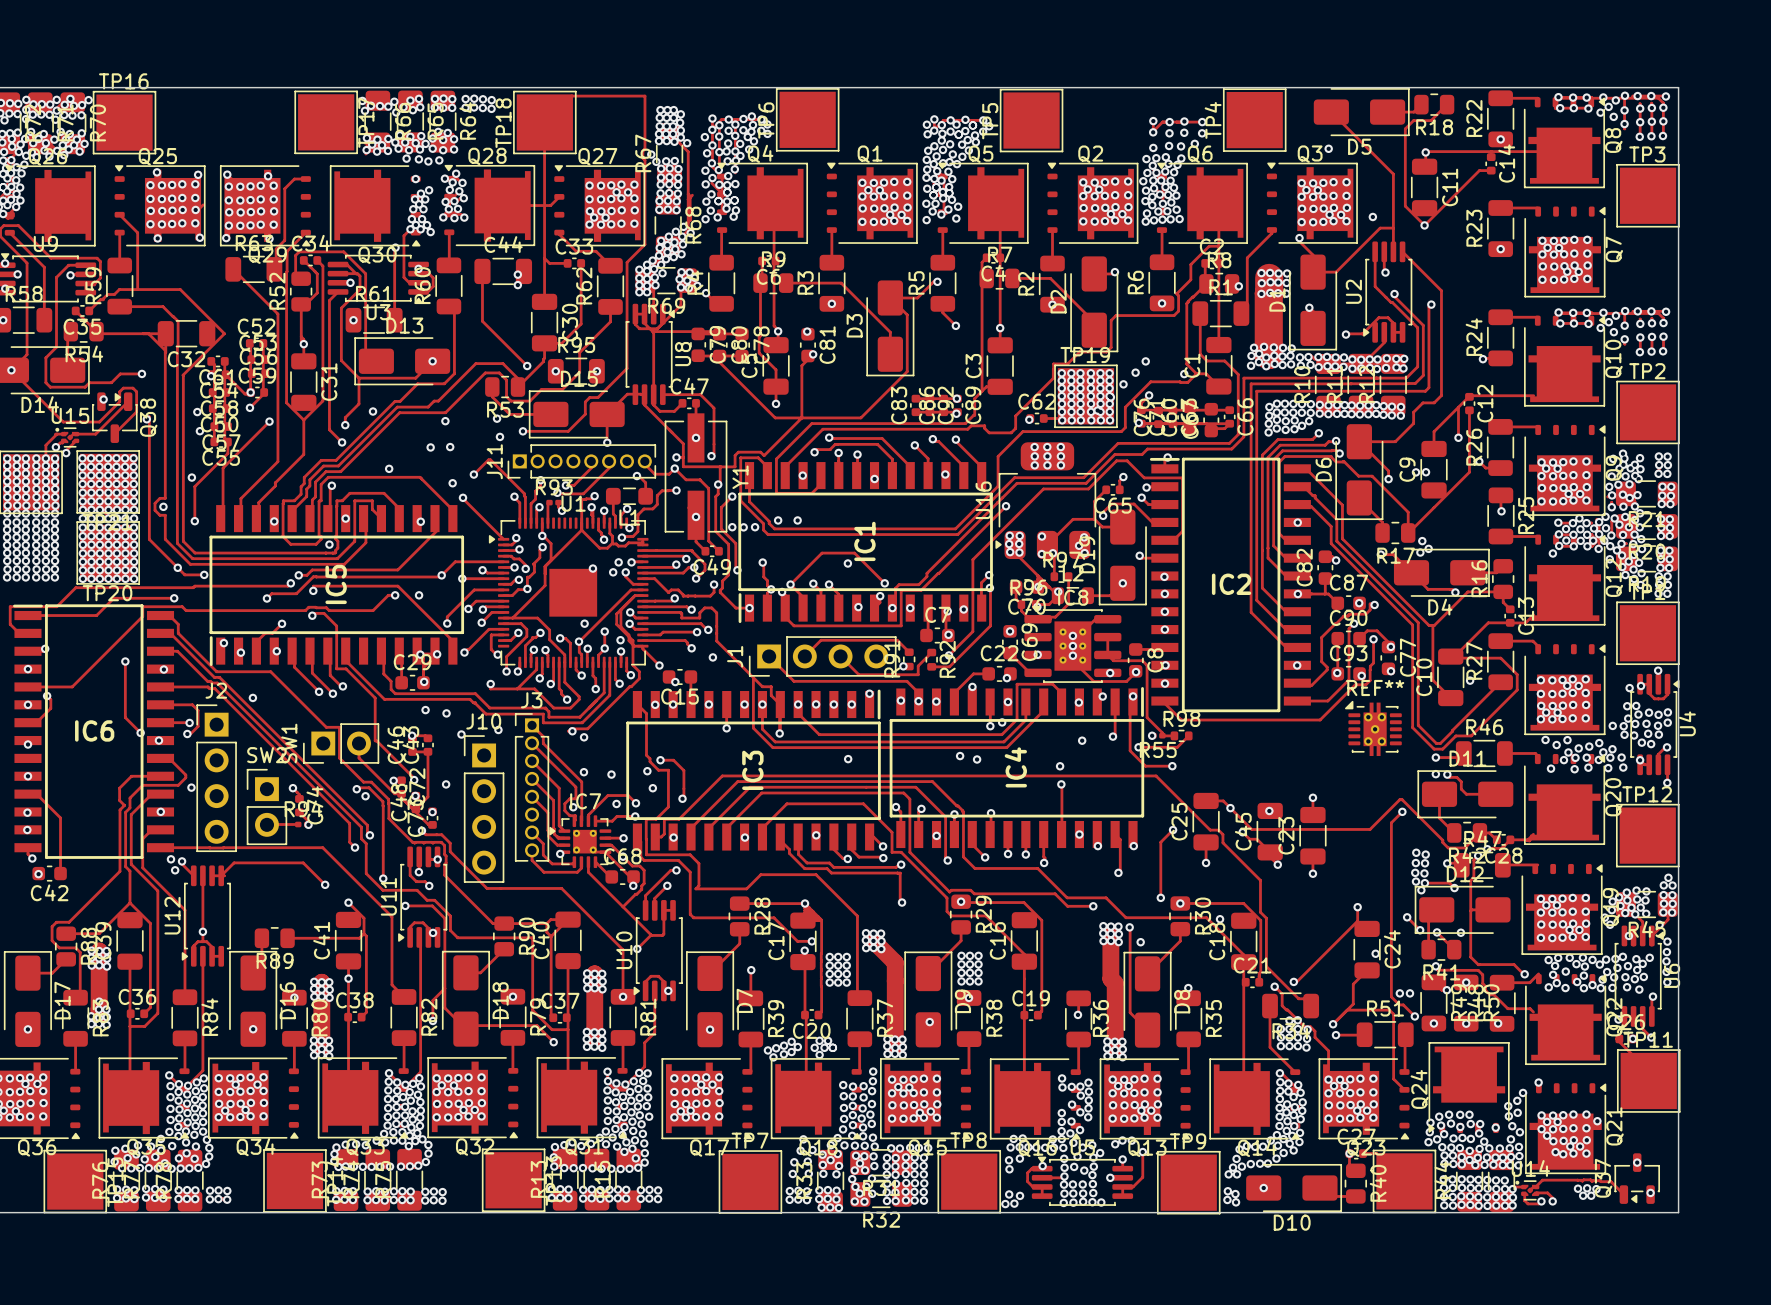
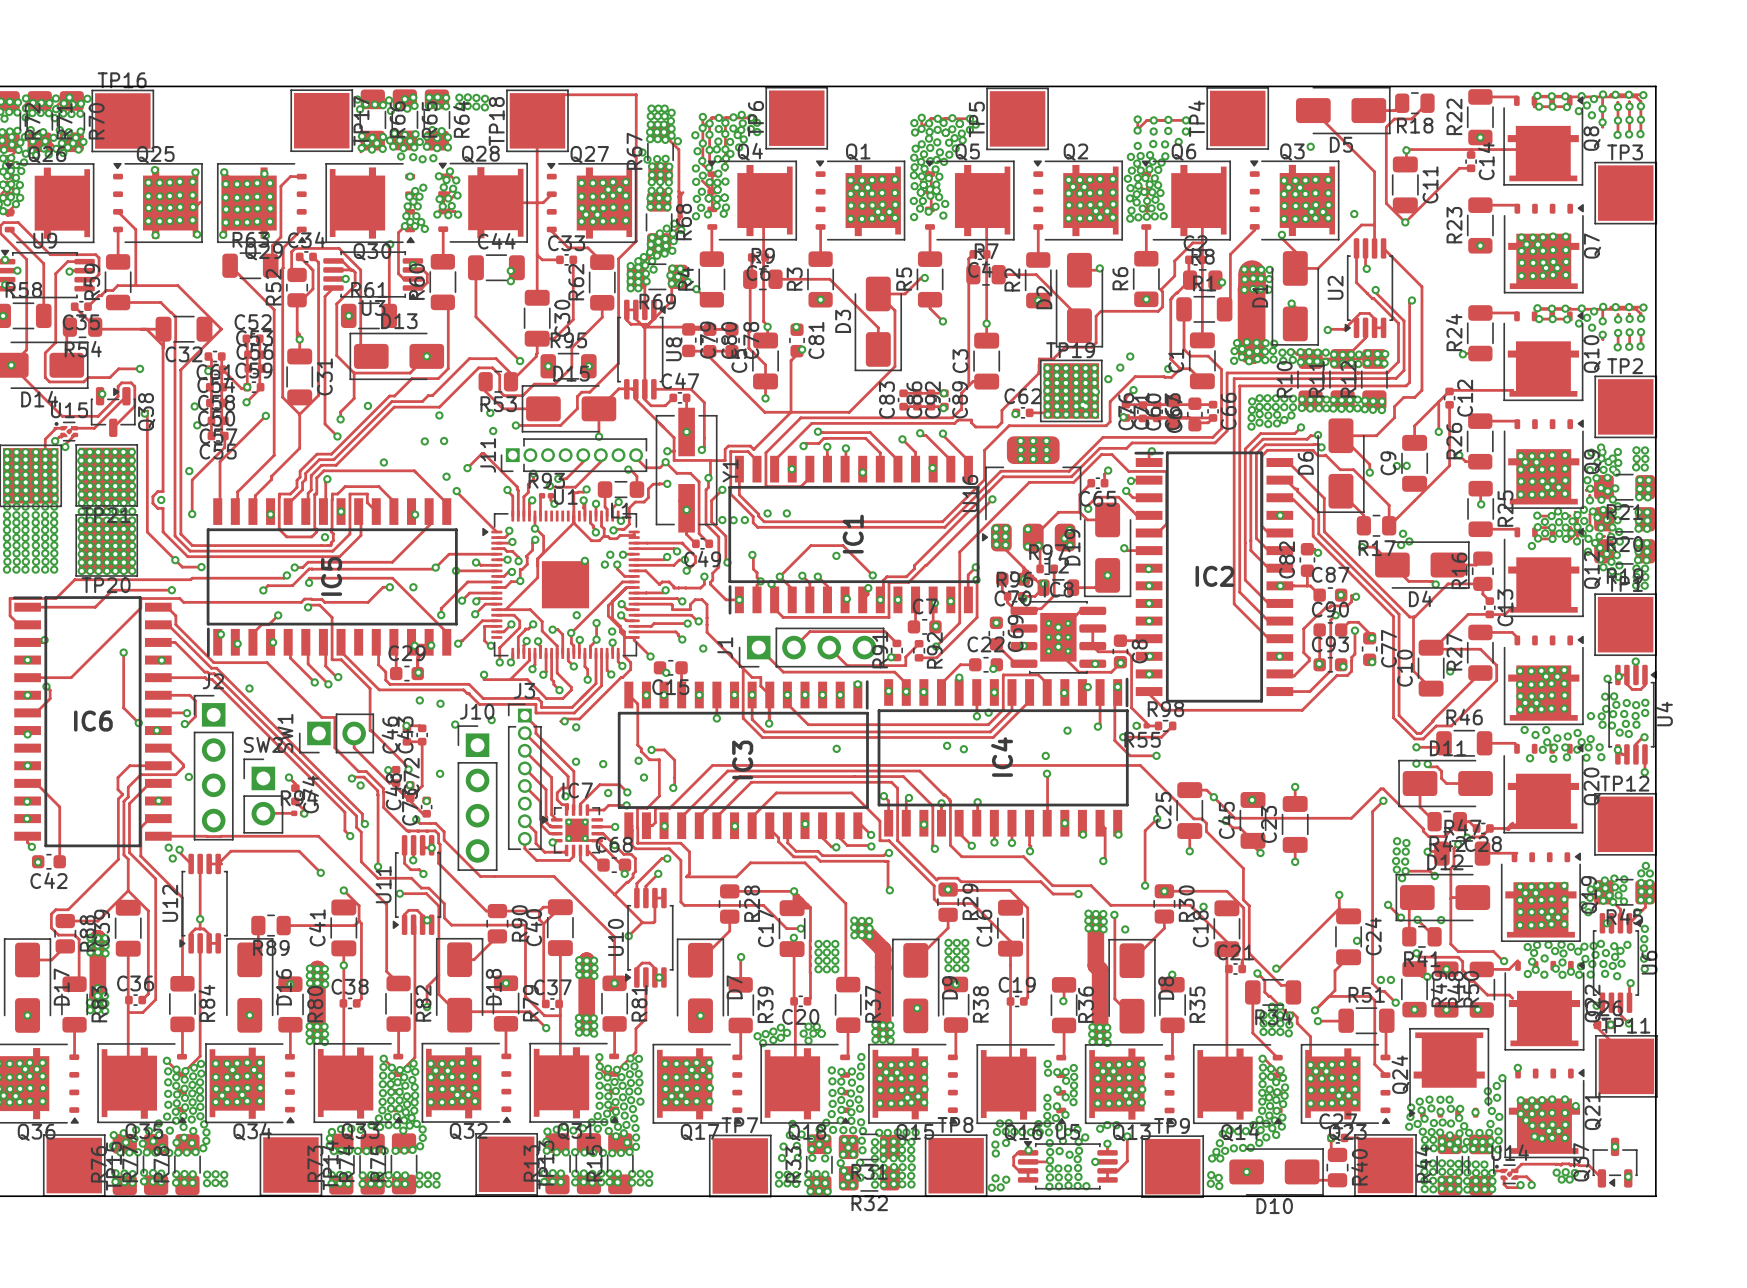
REF**: (1373, 728) -> none

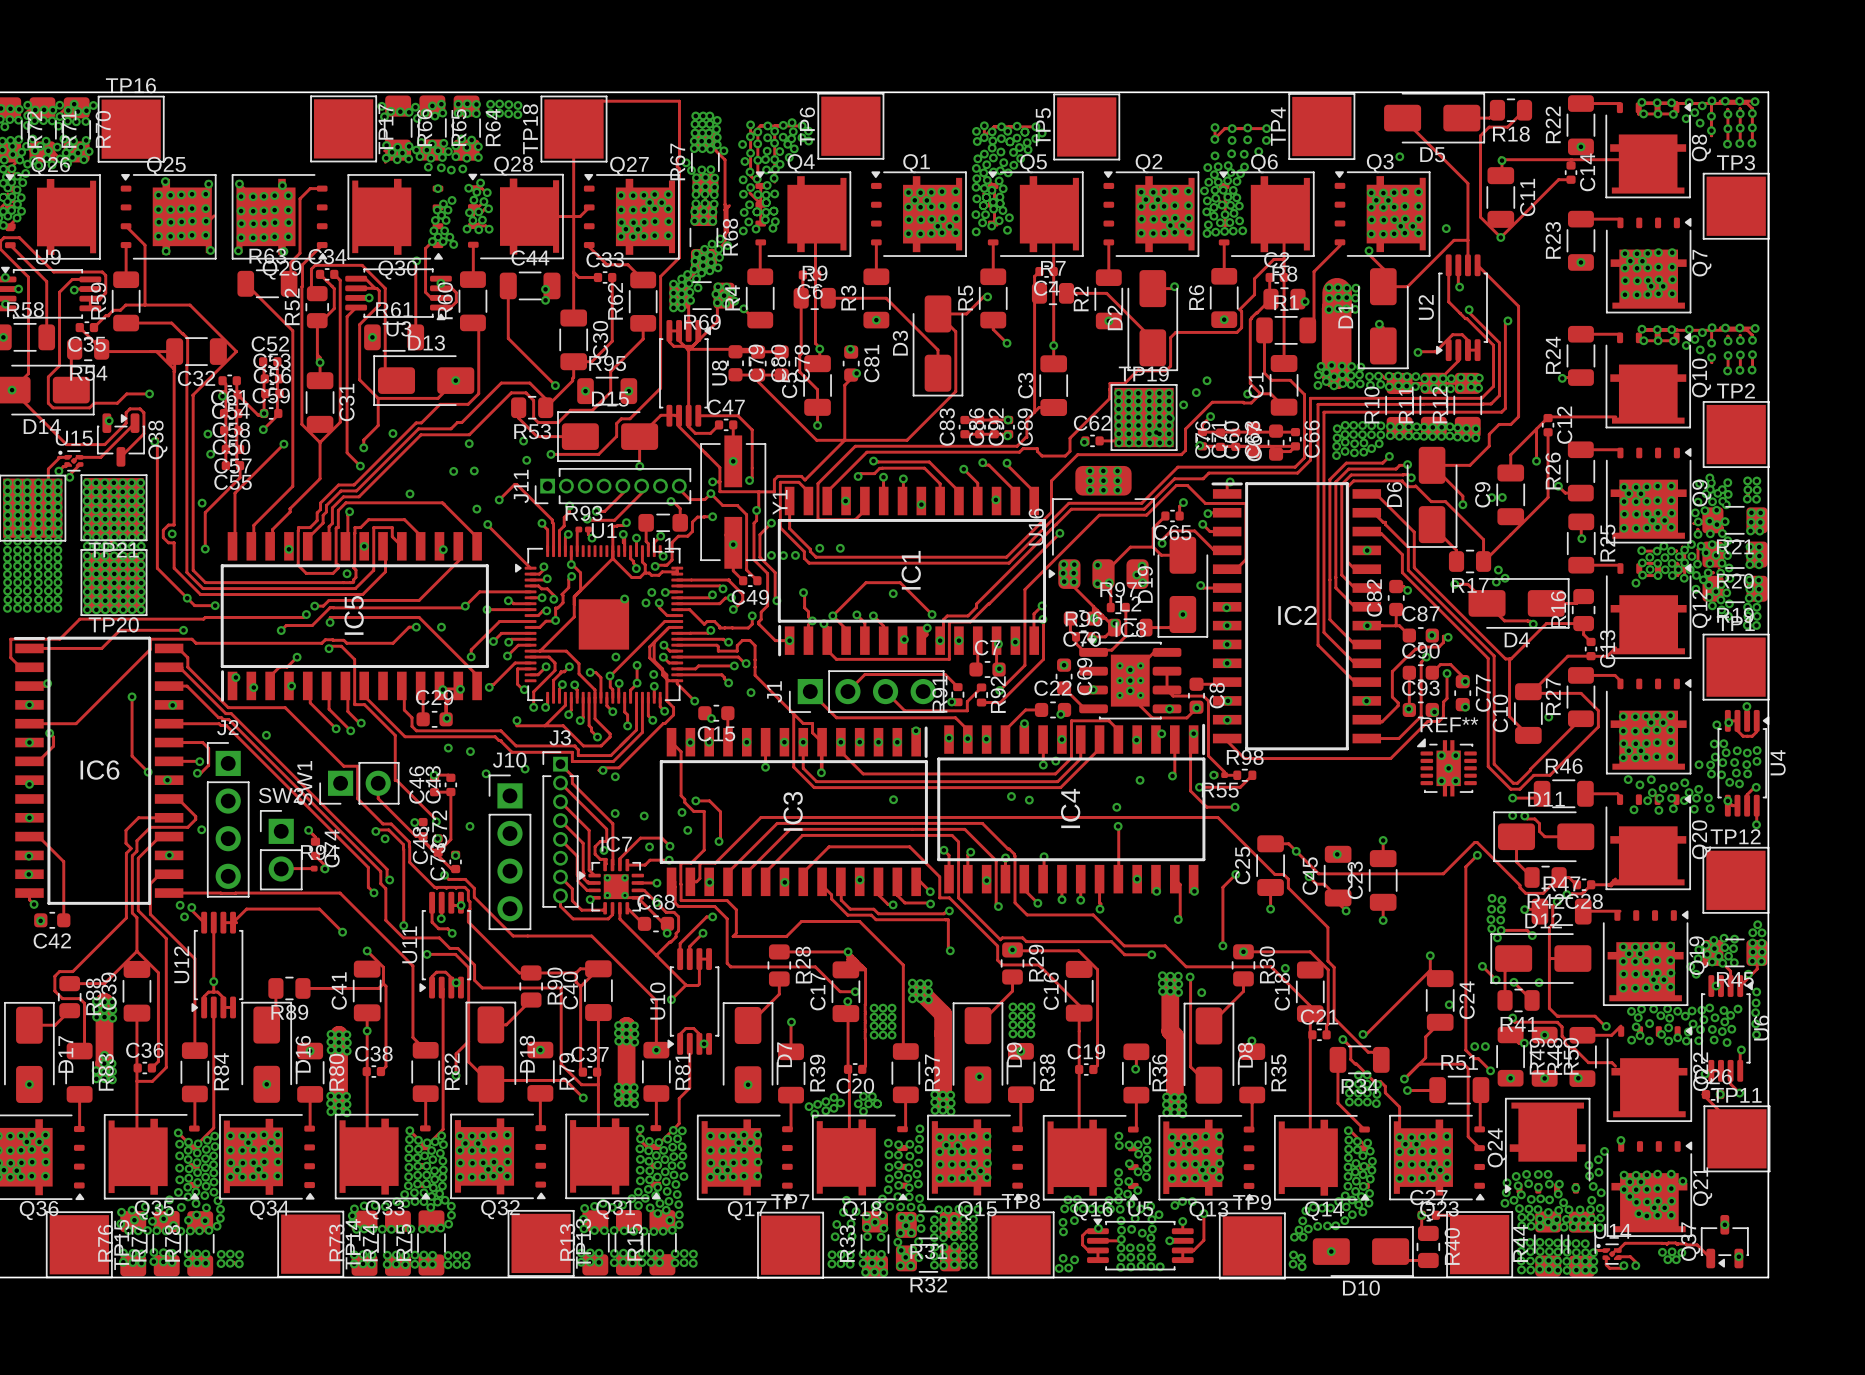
REF**: none -> (1446, 767)

